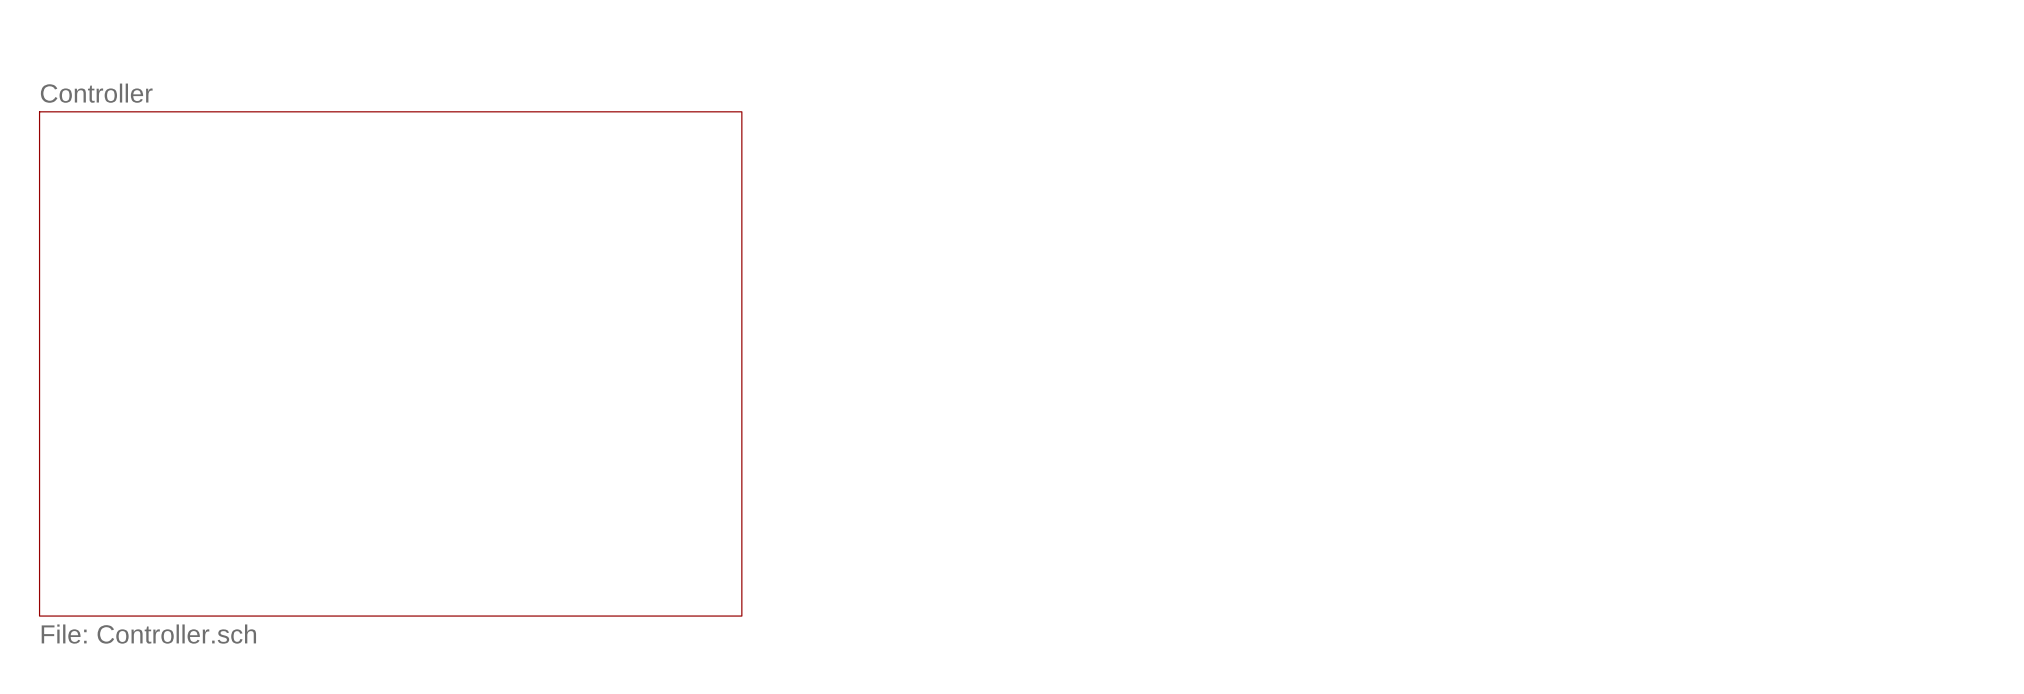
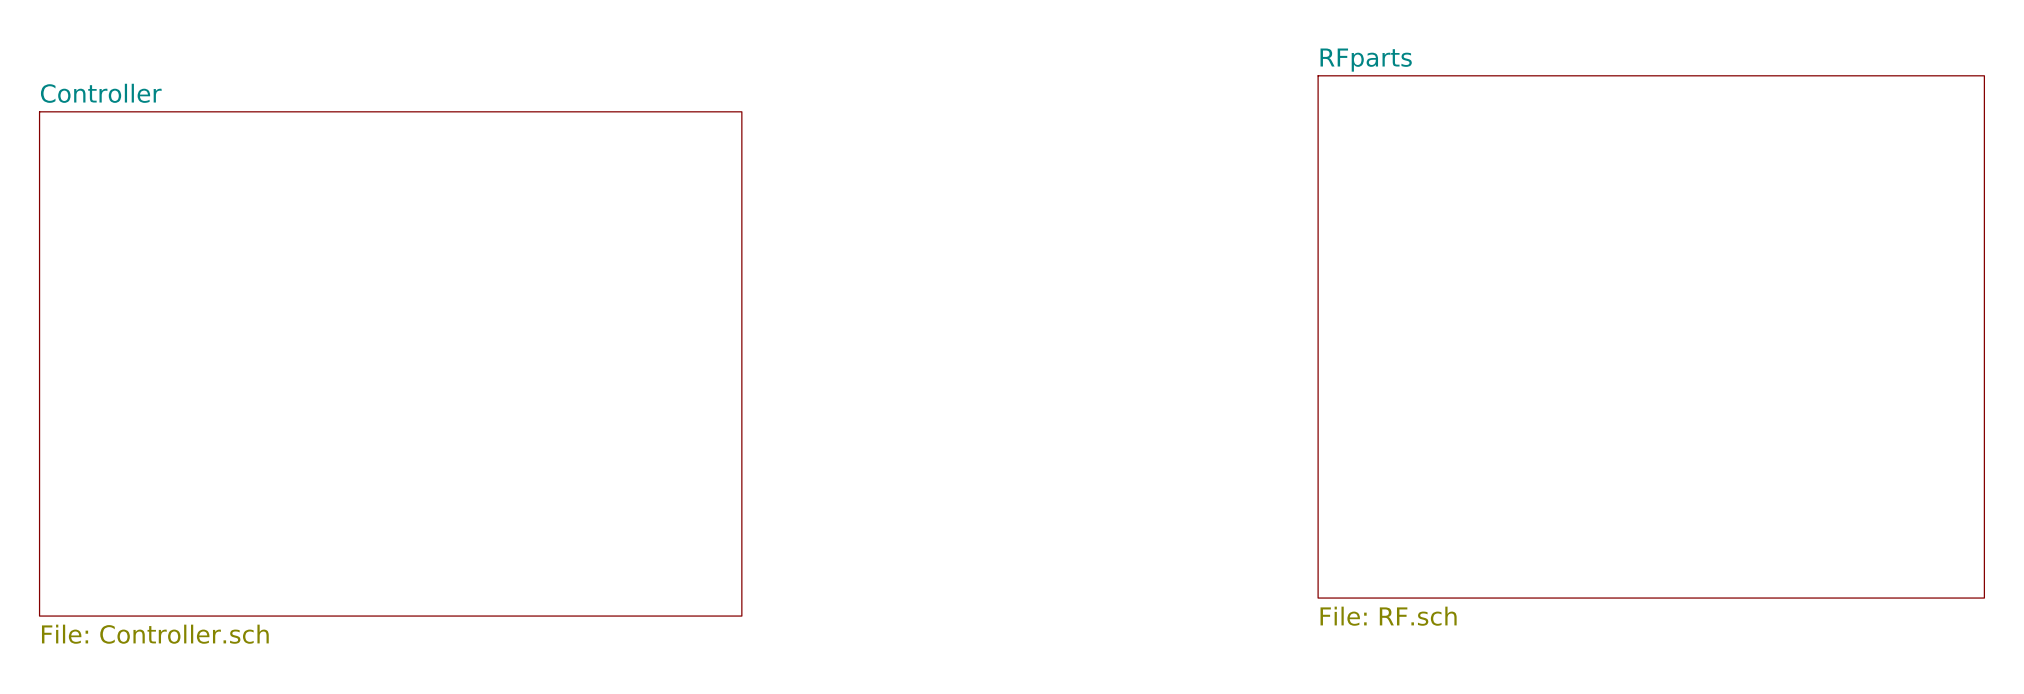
sheet RFparts: none -> File: RF.sch (1651, 336)

